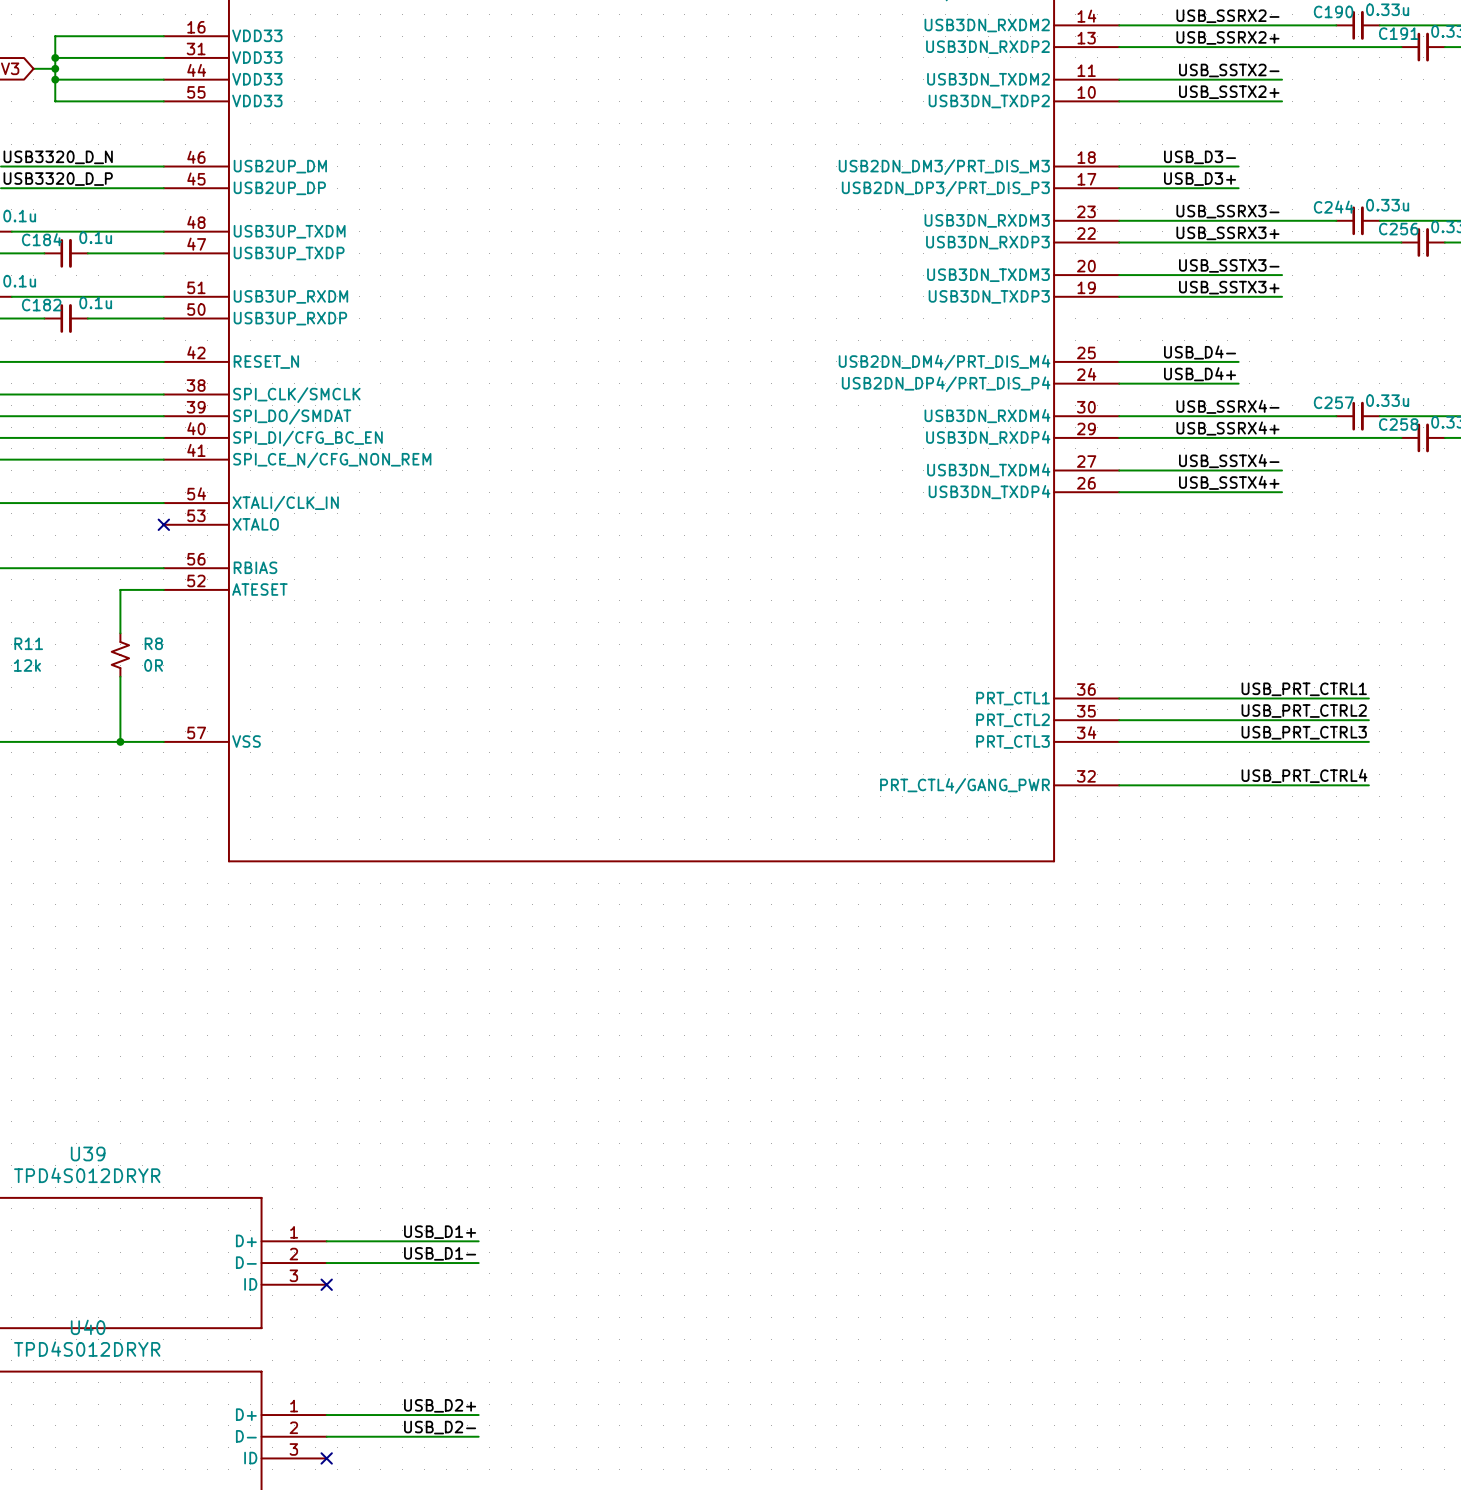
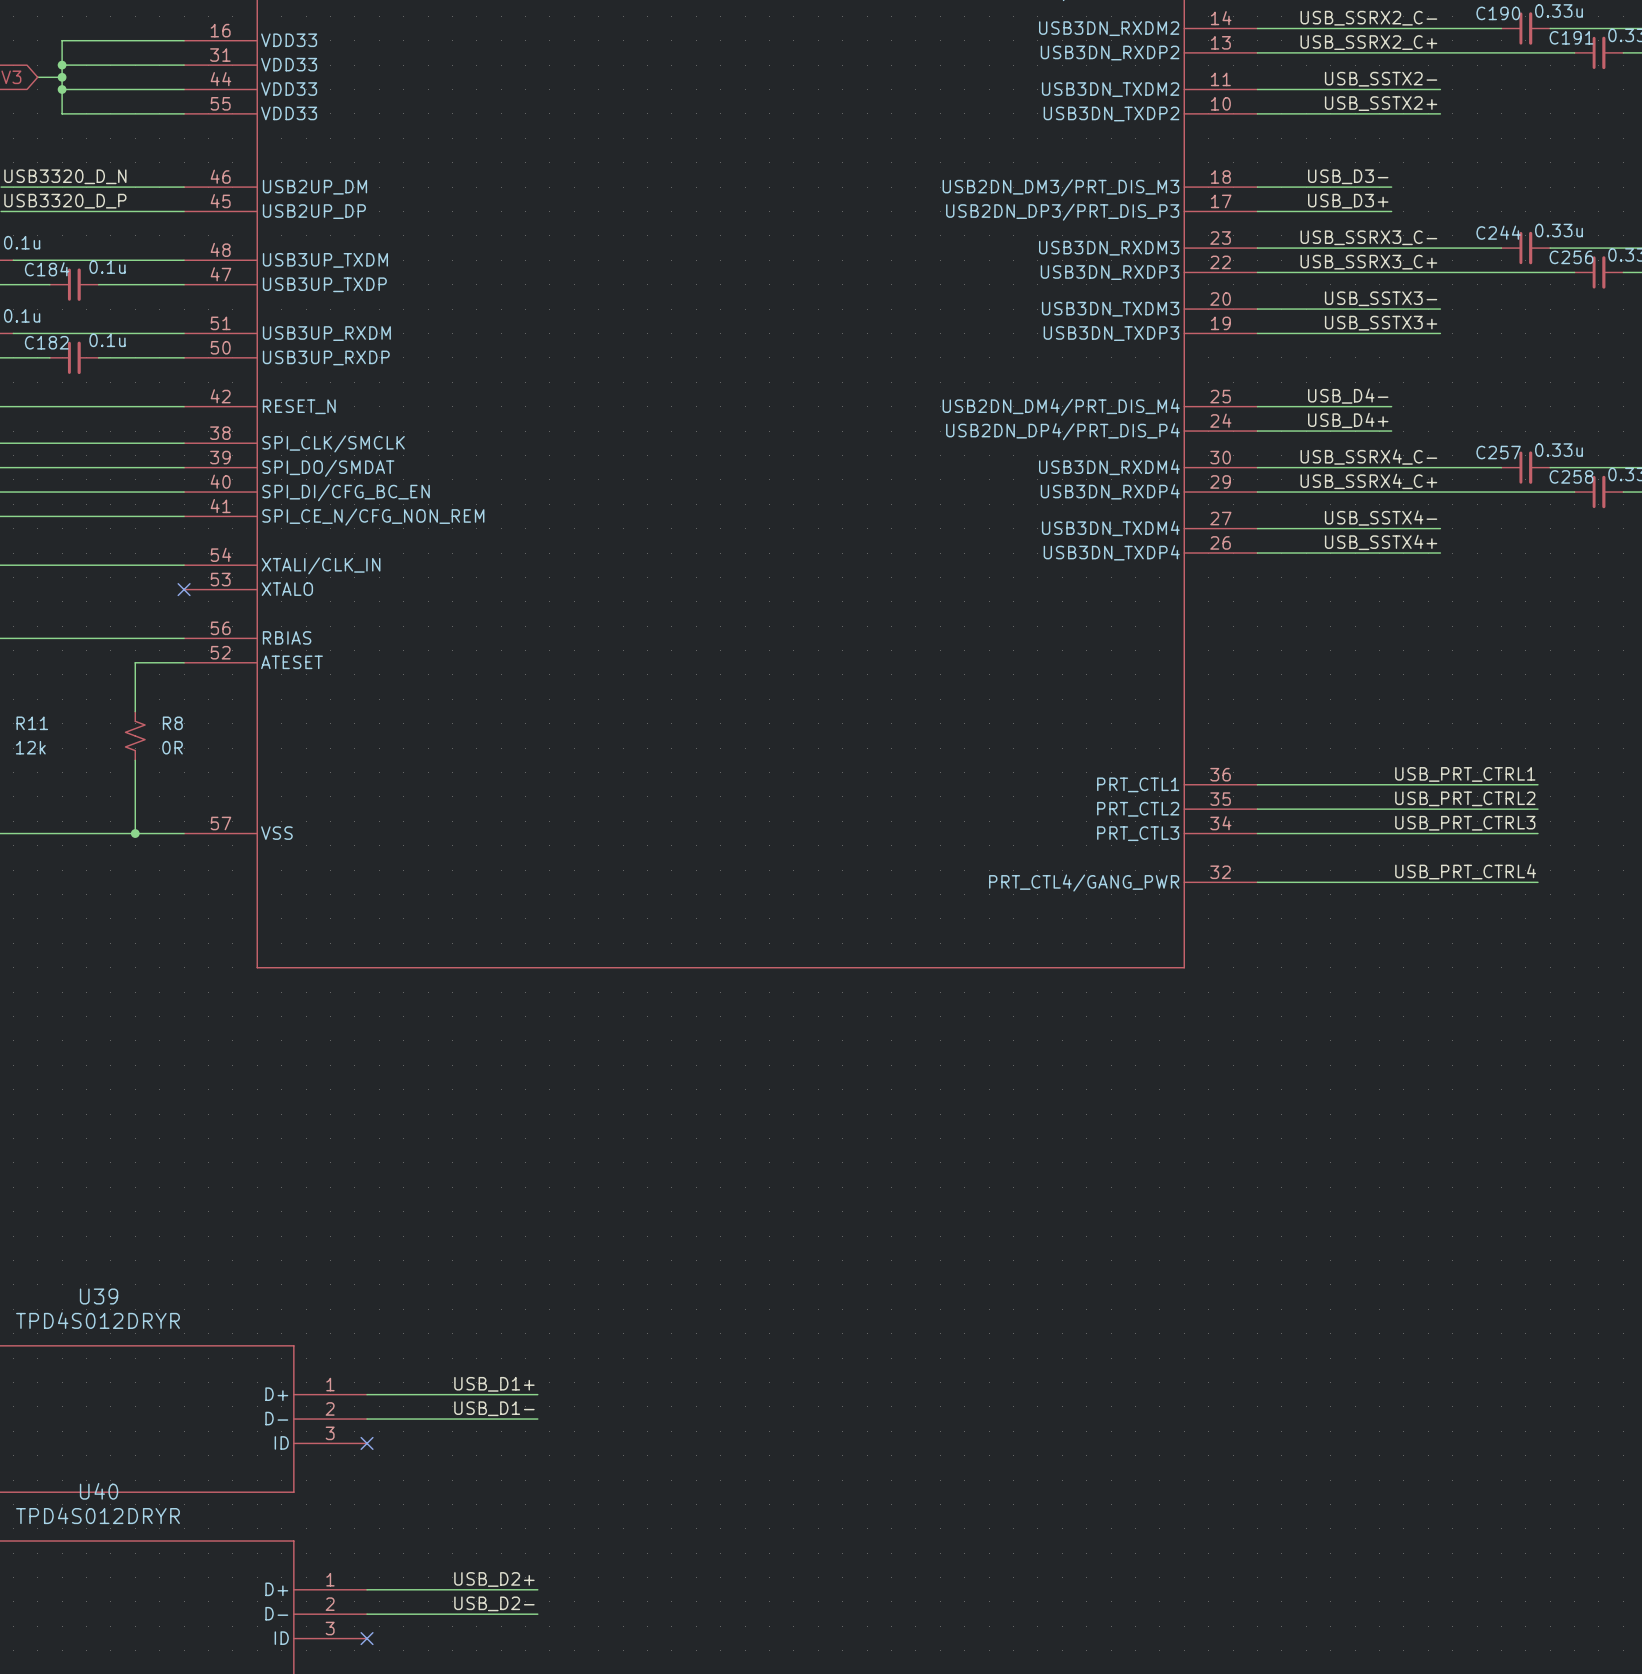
label: USB_SSRX2- (1227, 16) -> USB_SSRX2_C- (1368, 18)
label: USB_SSRX2+ (1227, 37) -> USB_SSRX2_C+ (1368, 42)
label: USB_SSRX3- (1227, 211) -> USB_SSRX3_C- (1368, 237)
label: USB_SSRX3+ (1227, 233) -> USB_SSRX3_C+ (1368, 262)
label: USB_SSRX4- (1227, 406) -> USB_SSRX4_C- (1368, 457)
label: USB_SSRX4+ (1227, 428) -> USB_SSRX4_C+ (1368, 481)

